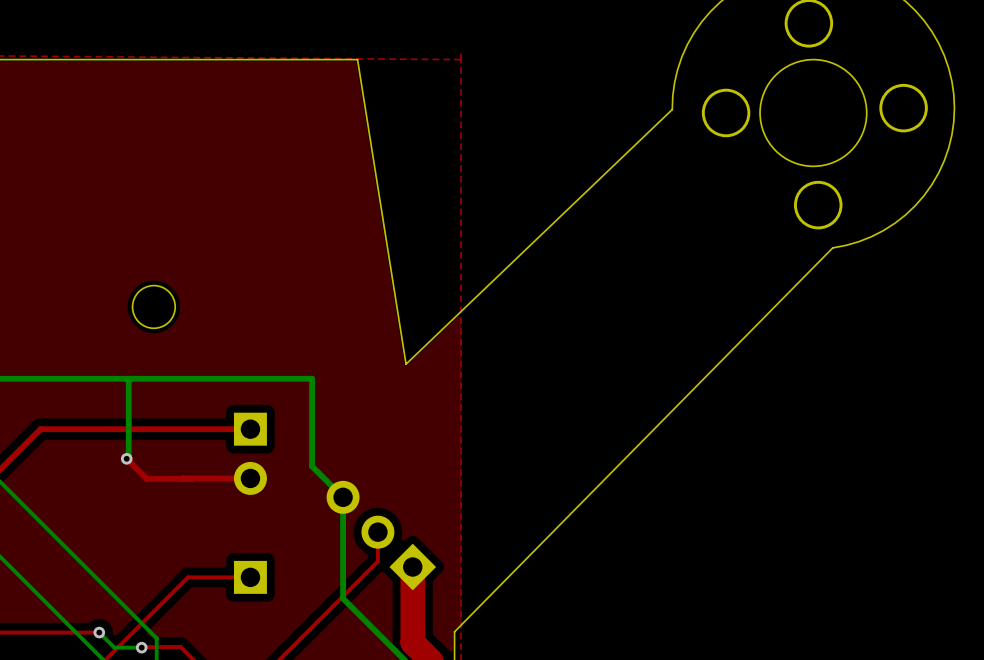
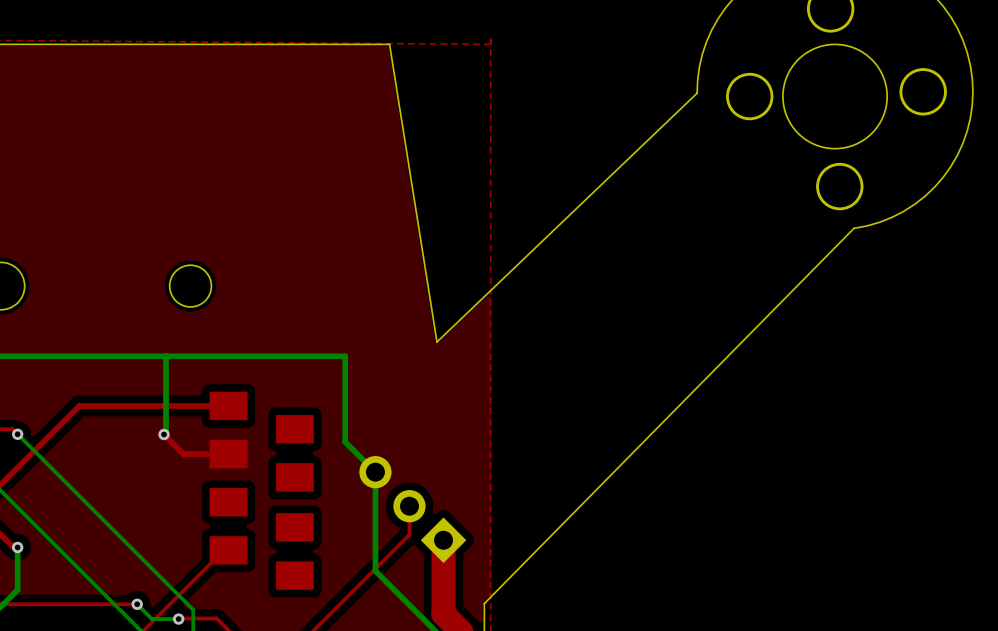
part footprint: [233, 412, 267, 495] -> [275, 415, 314, 444]
part: none -> (228, 405)
top track: (250, 429) (40, 429) -> (228, 405) (79, 405)
part: none -> (228, 454)
top track: (250, 478) (182, 478) -> none
part: none -> (294, 477)
part: none -> (228, 502)
part: none -> (294, 527)
part: none -> (228, 550)
top track: (250, 577) (192, 577) -> none
part: (250, 577) -> none
part: none -> (294, 575)

